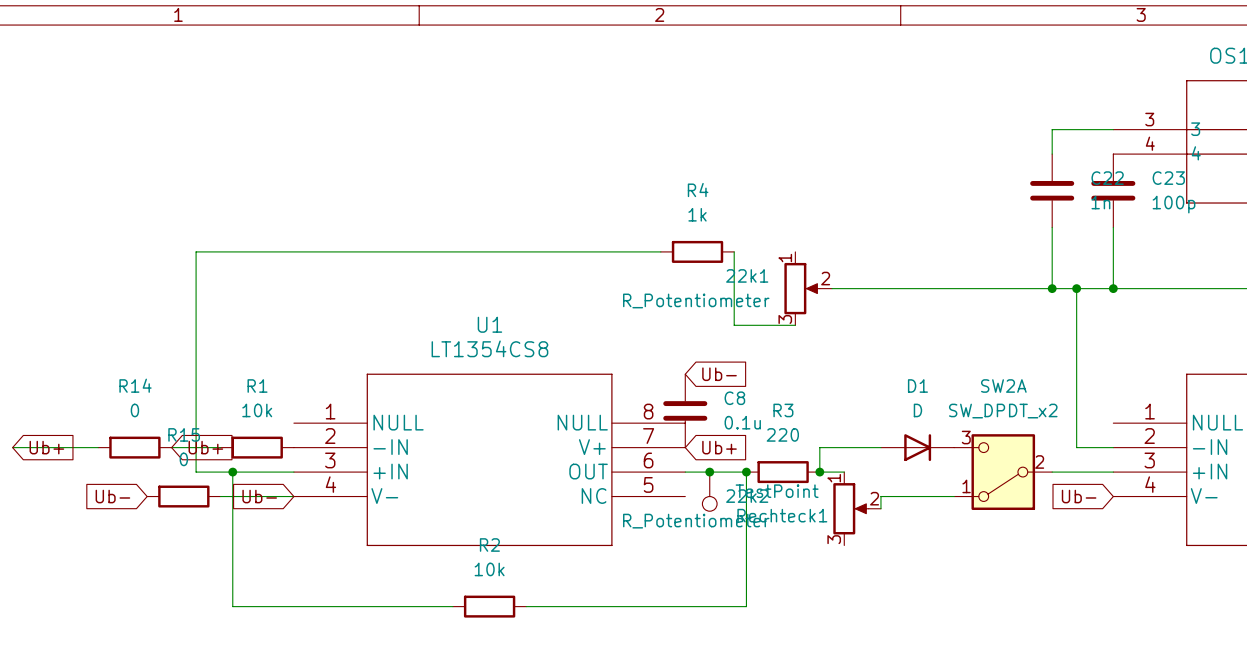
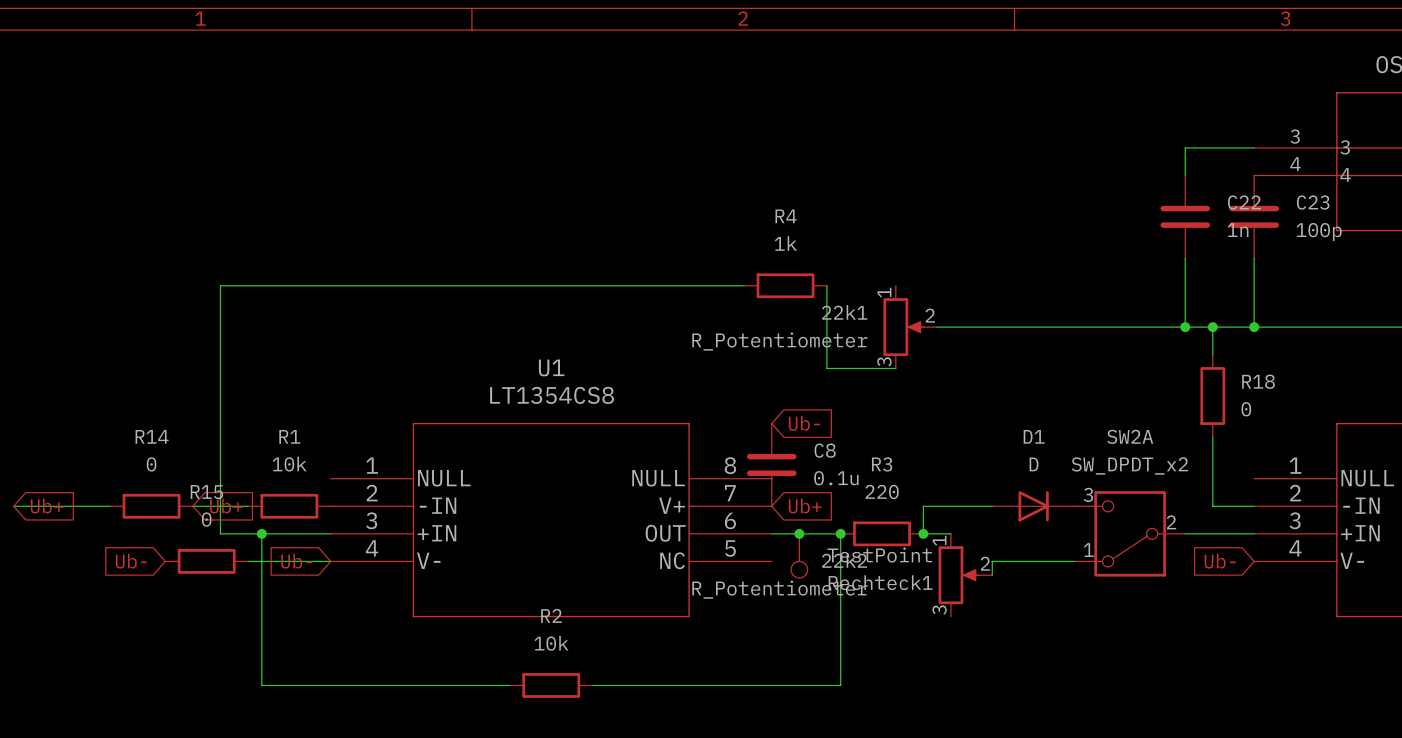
wire: (1076, 313) (1076, 386) -> none
R18: none -> 0 (1212, 396)

